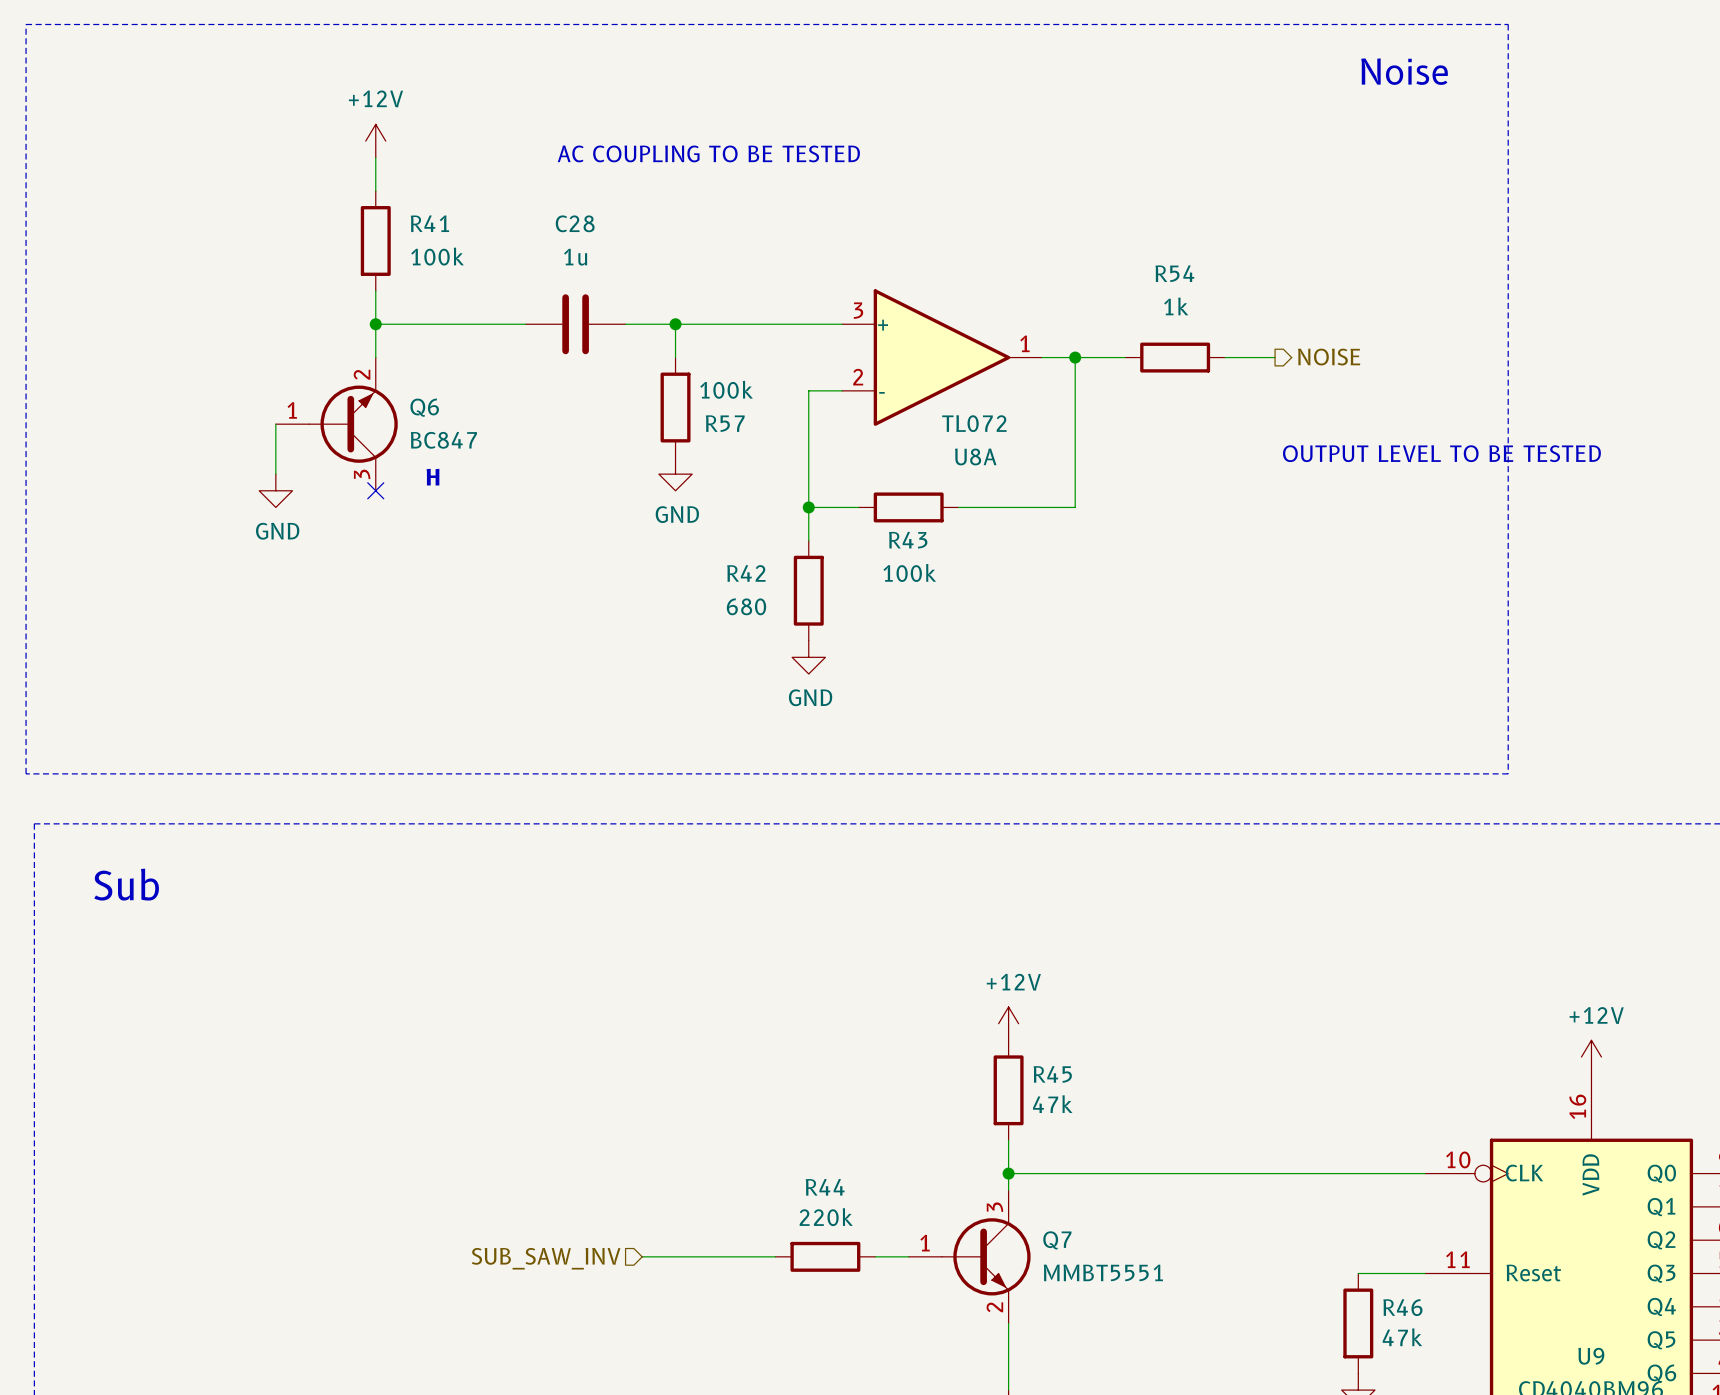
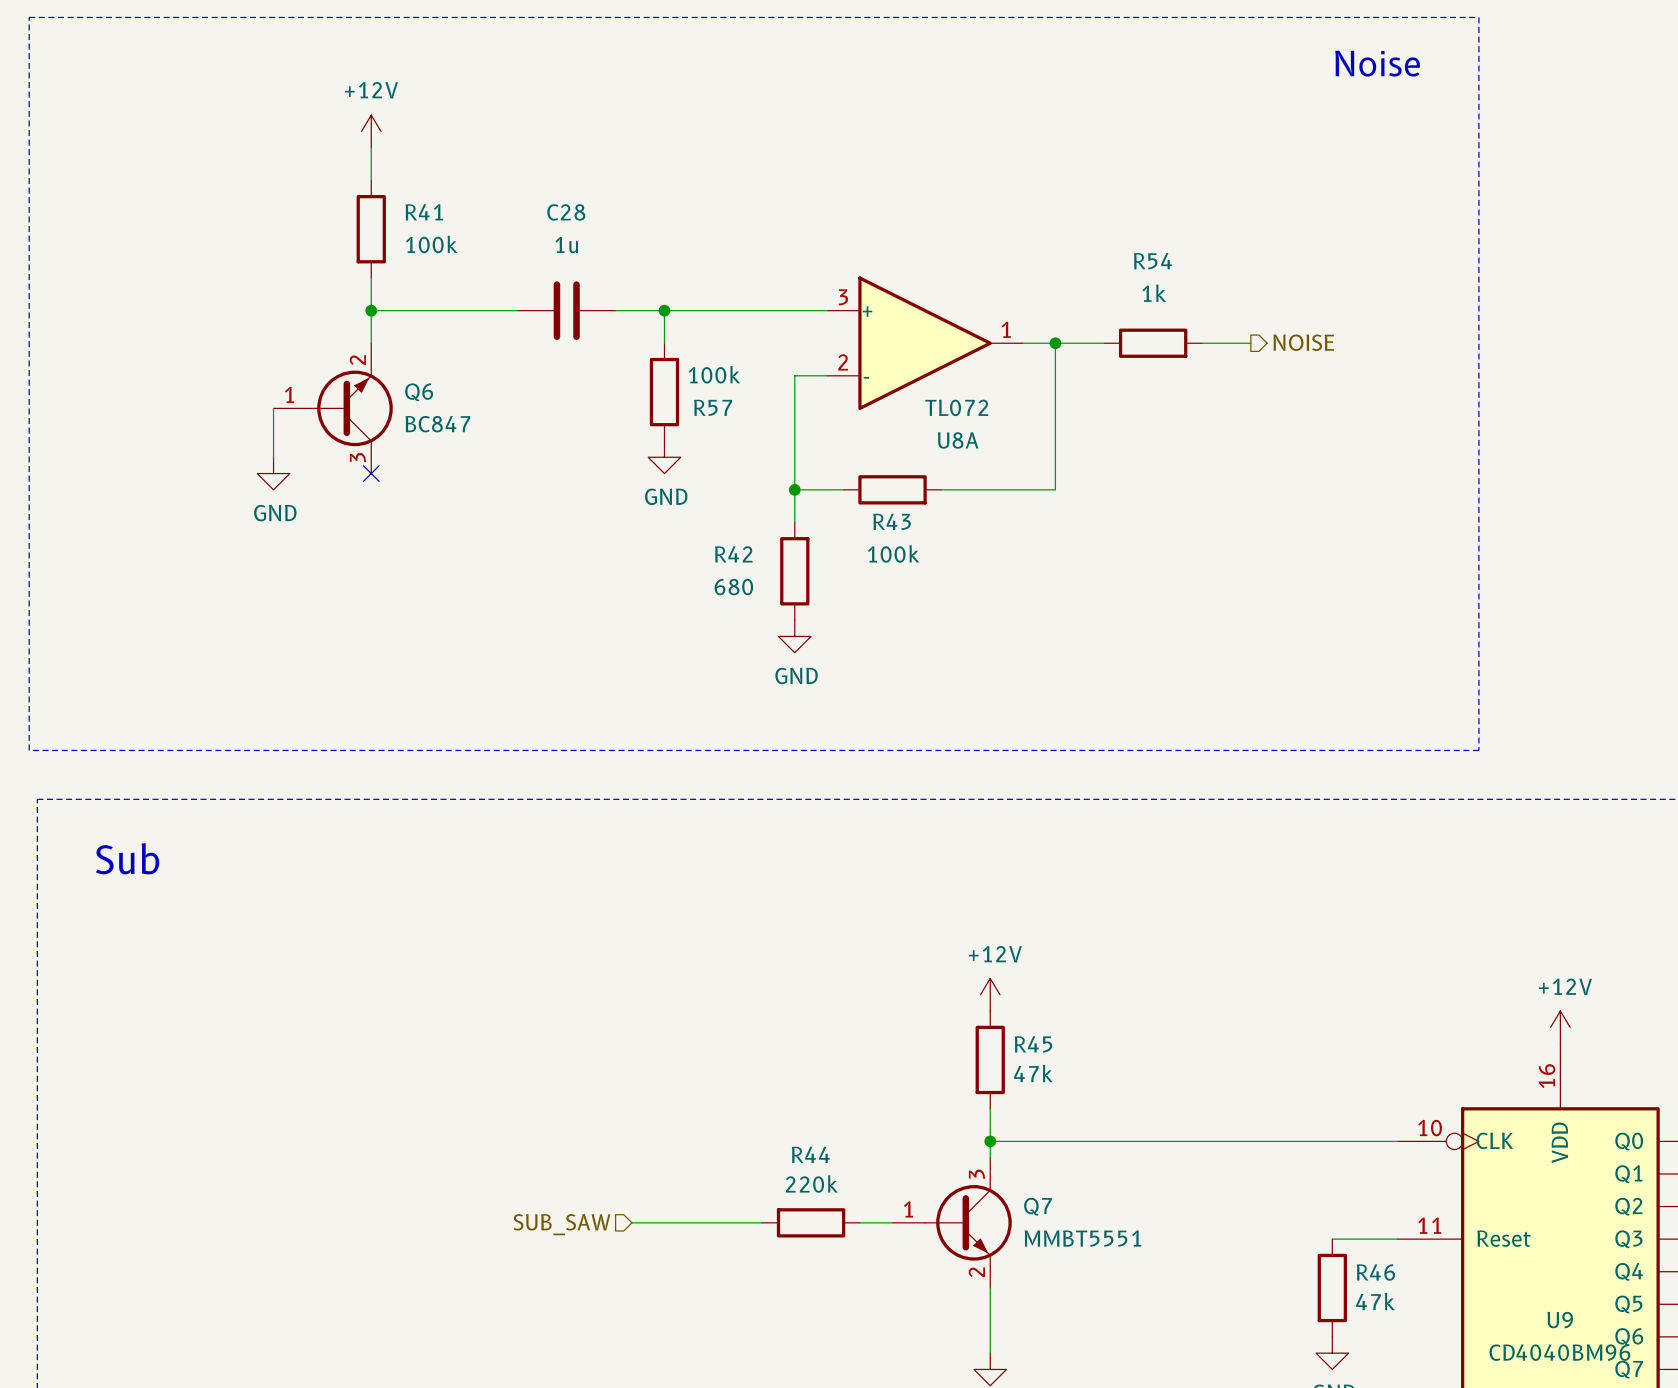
text: AC COUPLING TO BE TESTED (708, 153) -> none
text: OUTPUT LEVEL TO BE TESTED (1441, 453) -> none
text: H (432, 477) -> none
hierarchical label: SUB_SAW_INV (546, 1258) -> SUB_SAW (561, 1224)

